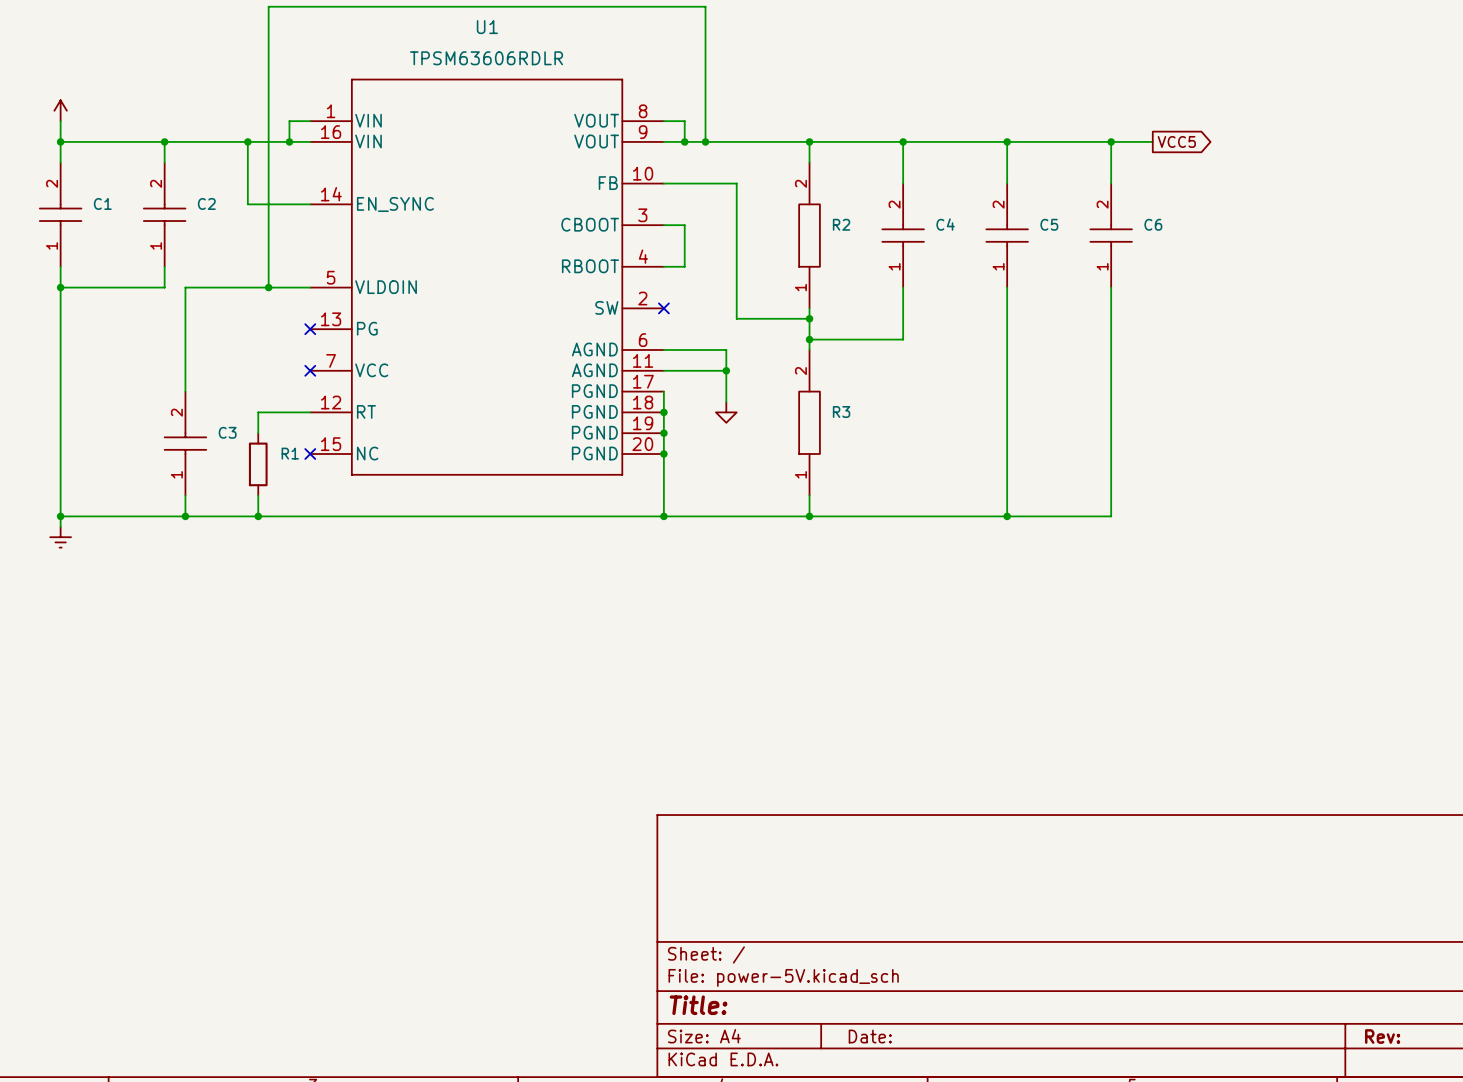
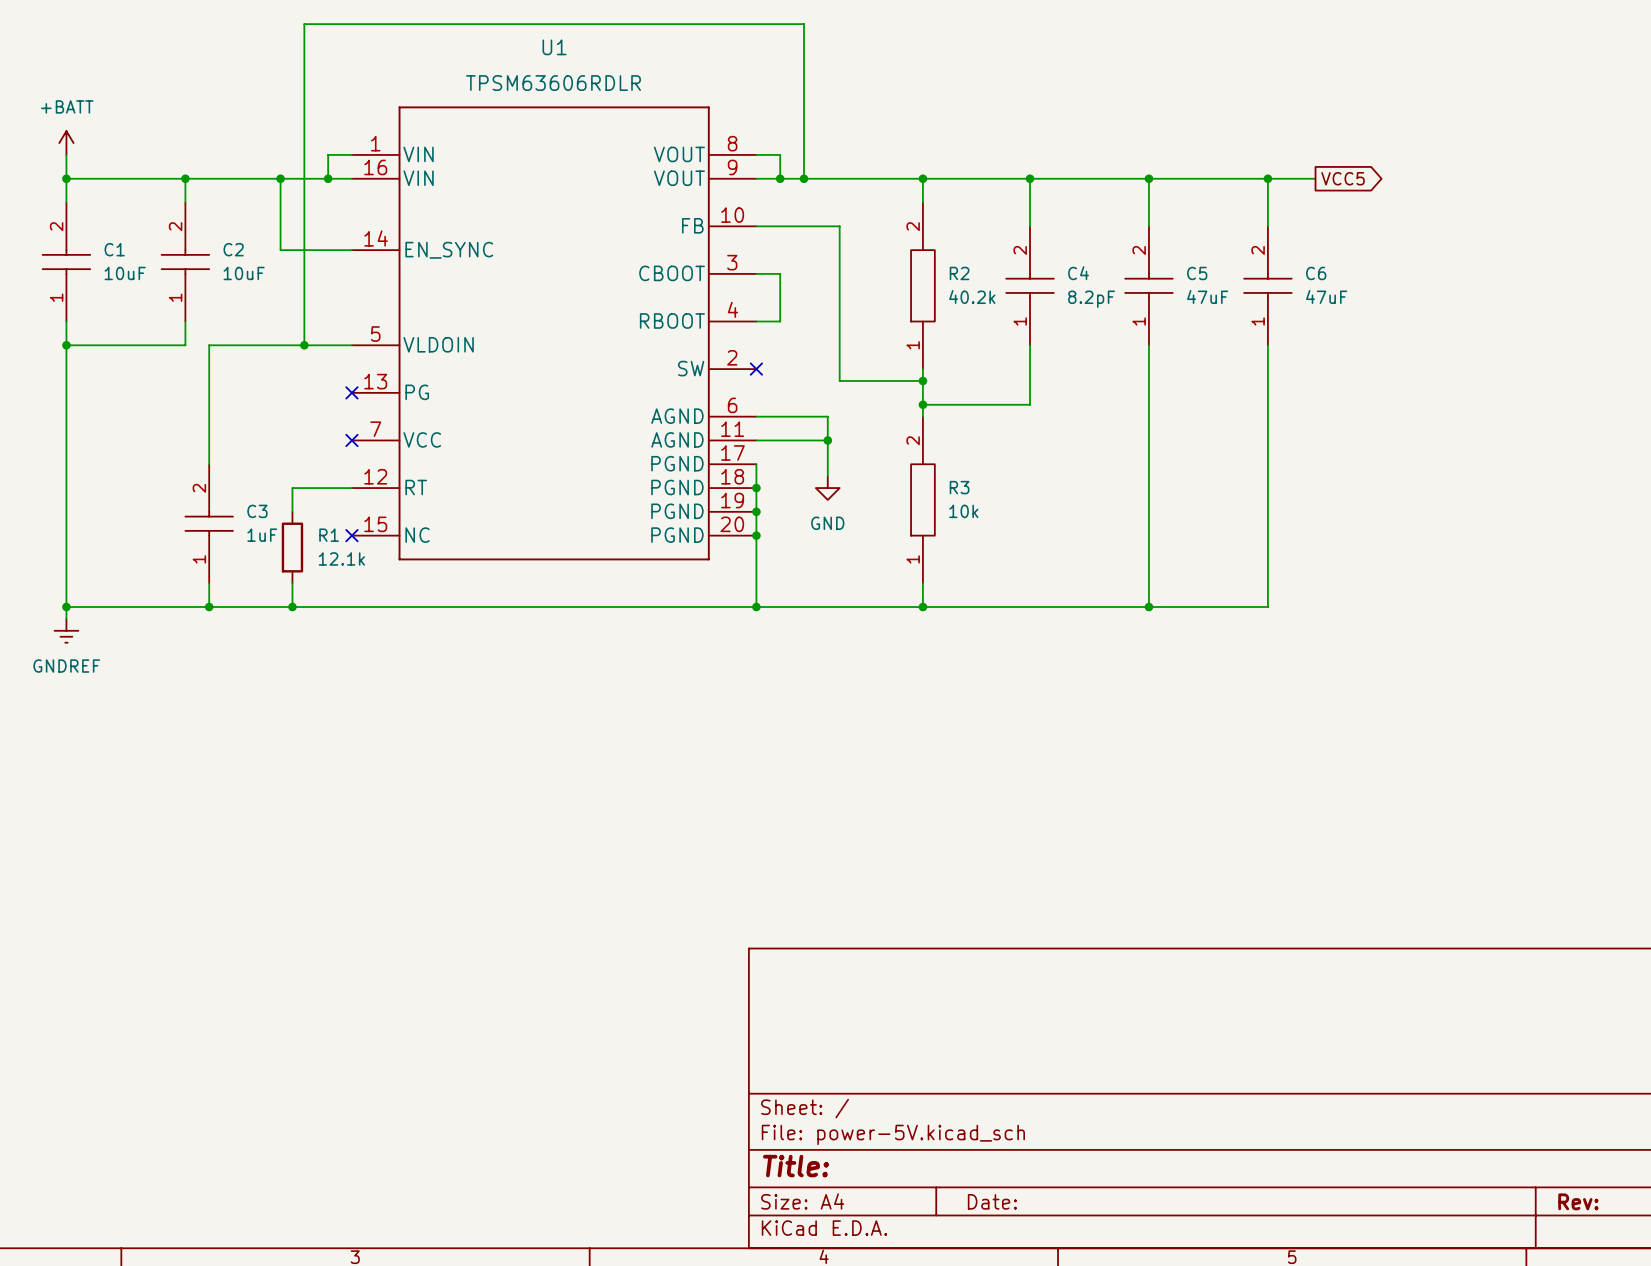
power symbol text: none -> +BATT (67, 106)
C1 value: none -> 10uF (125, 273)
C2 value: none -> 10uF (244, 273)
R2 value: none -> 40.2k (972, 296)
C5 value: none -> 47uF (1207, 296)
C6 value: none -> 47uF (1326, 296)
C4 value: none -> 8.2pF (1091, 299)
R3 value: none -> 10k (963, 511)
power symbol text: none -> GND (827, 523)
C3 value: none -> 1uF (262, 535)
R1 value: none -> 12.1k (341, 558)
power symbol text: none -> GNDREF (66, 666)

